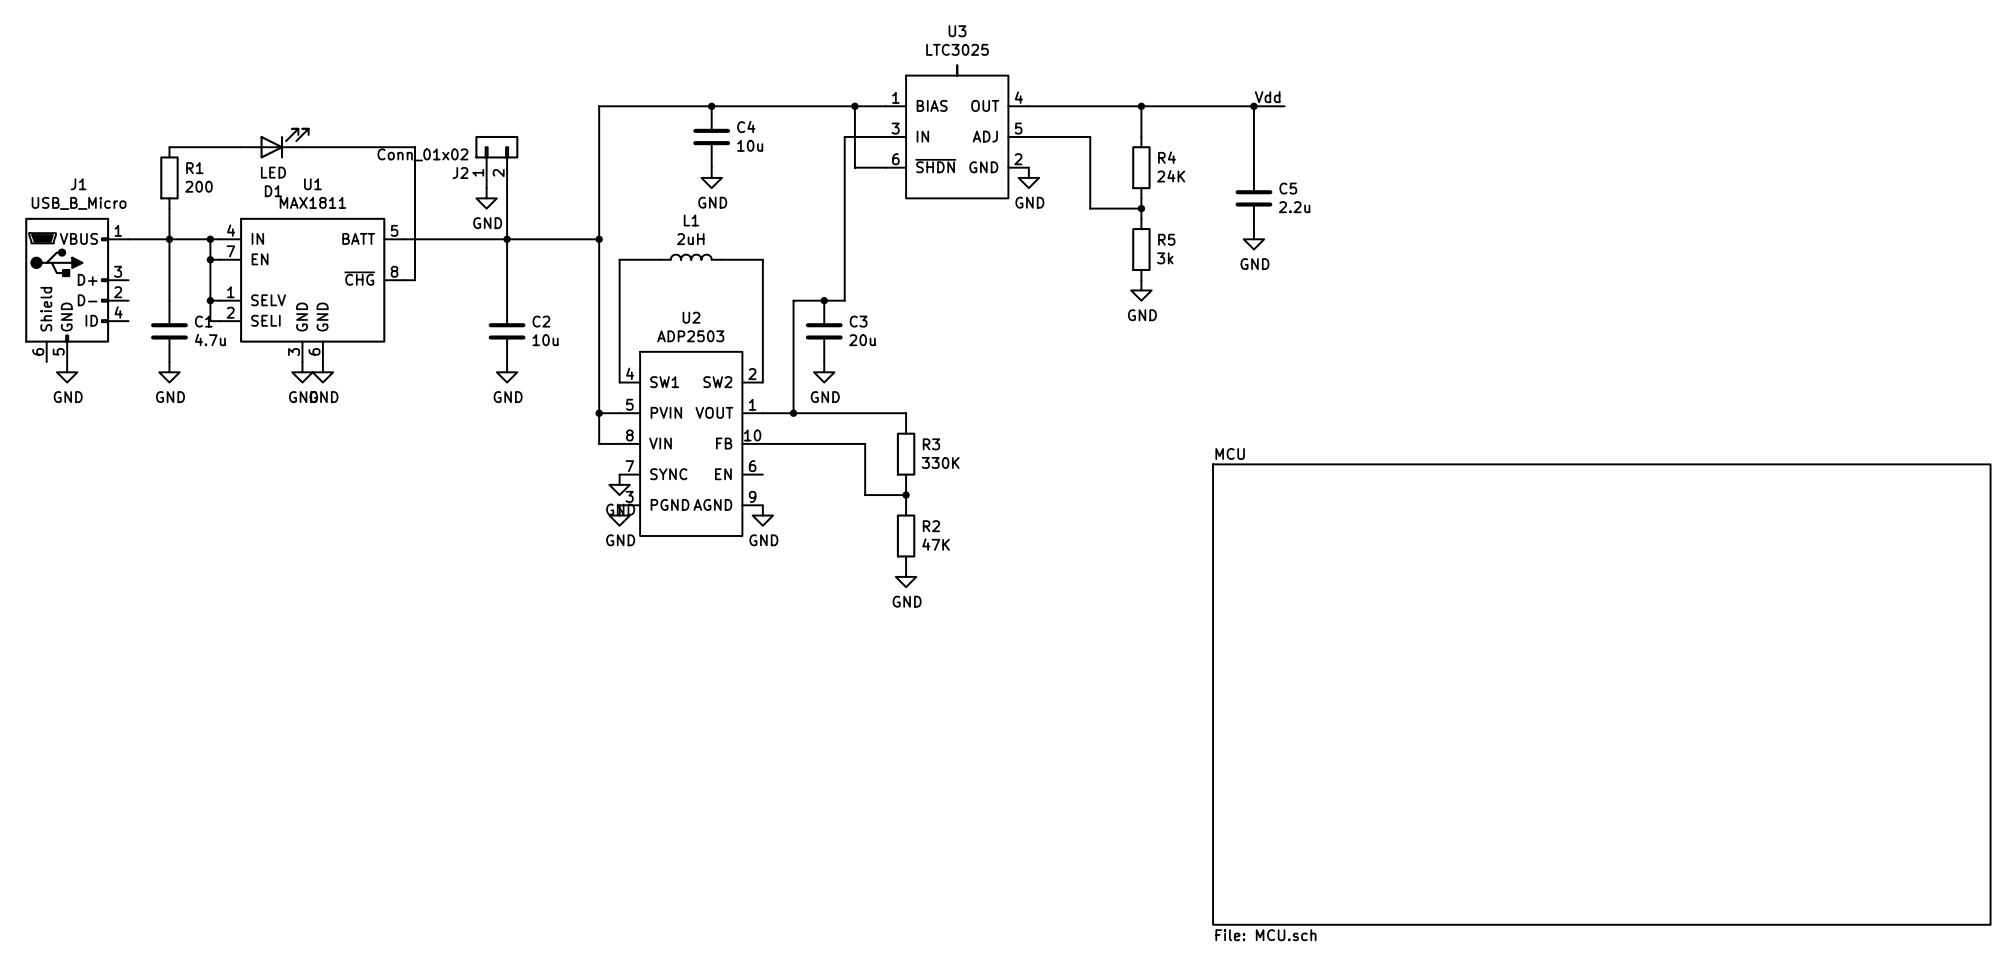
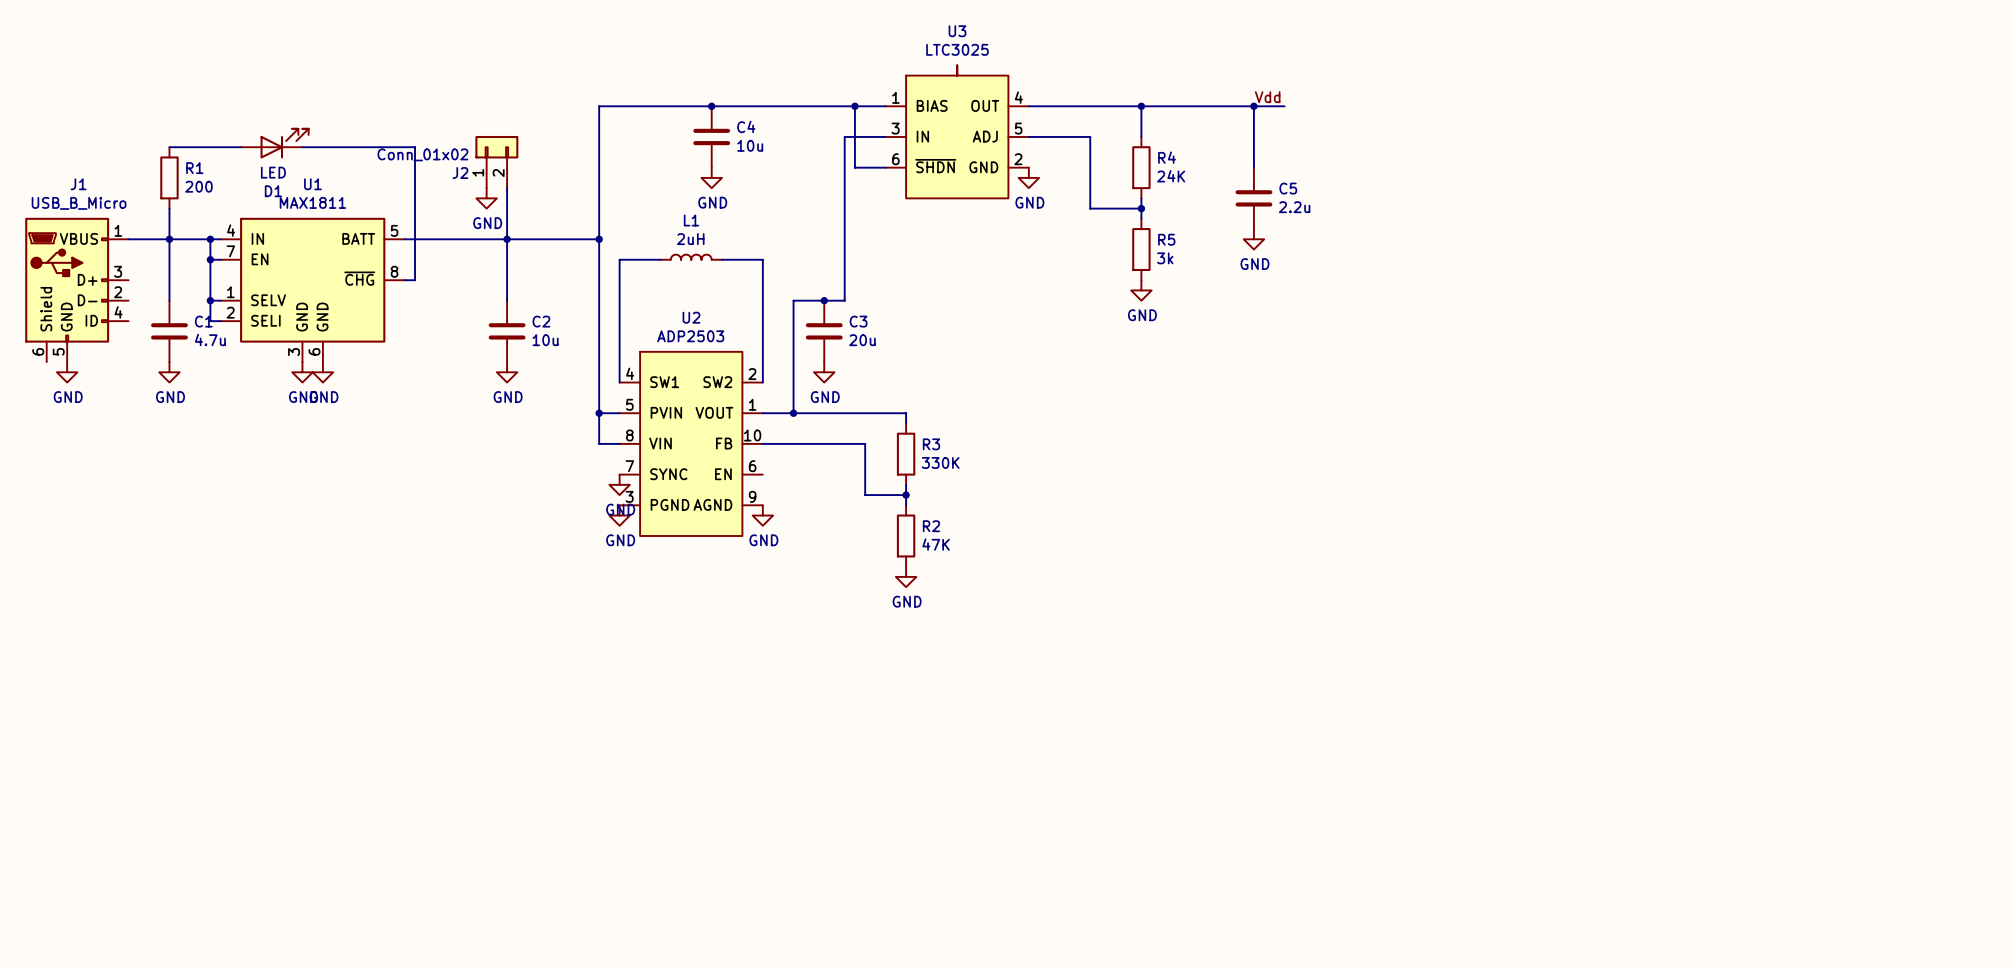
sheet MCU: File: MCU.sch (1601, 694) -> none

